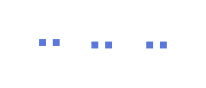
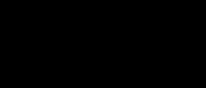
part: (49, 42) -> none
part: (101, 44) -> none
part: (156, 44) -> none

